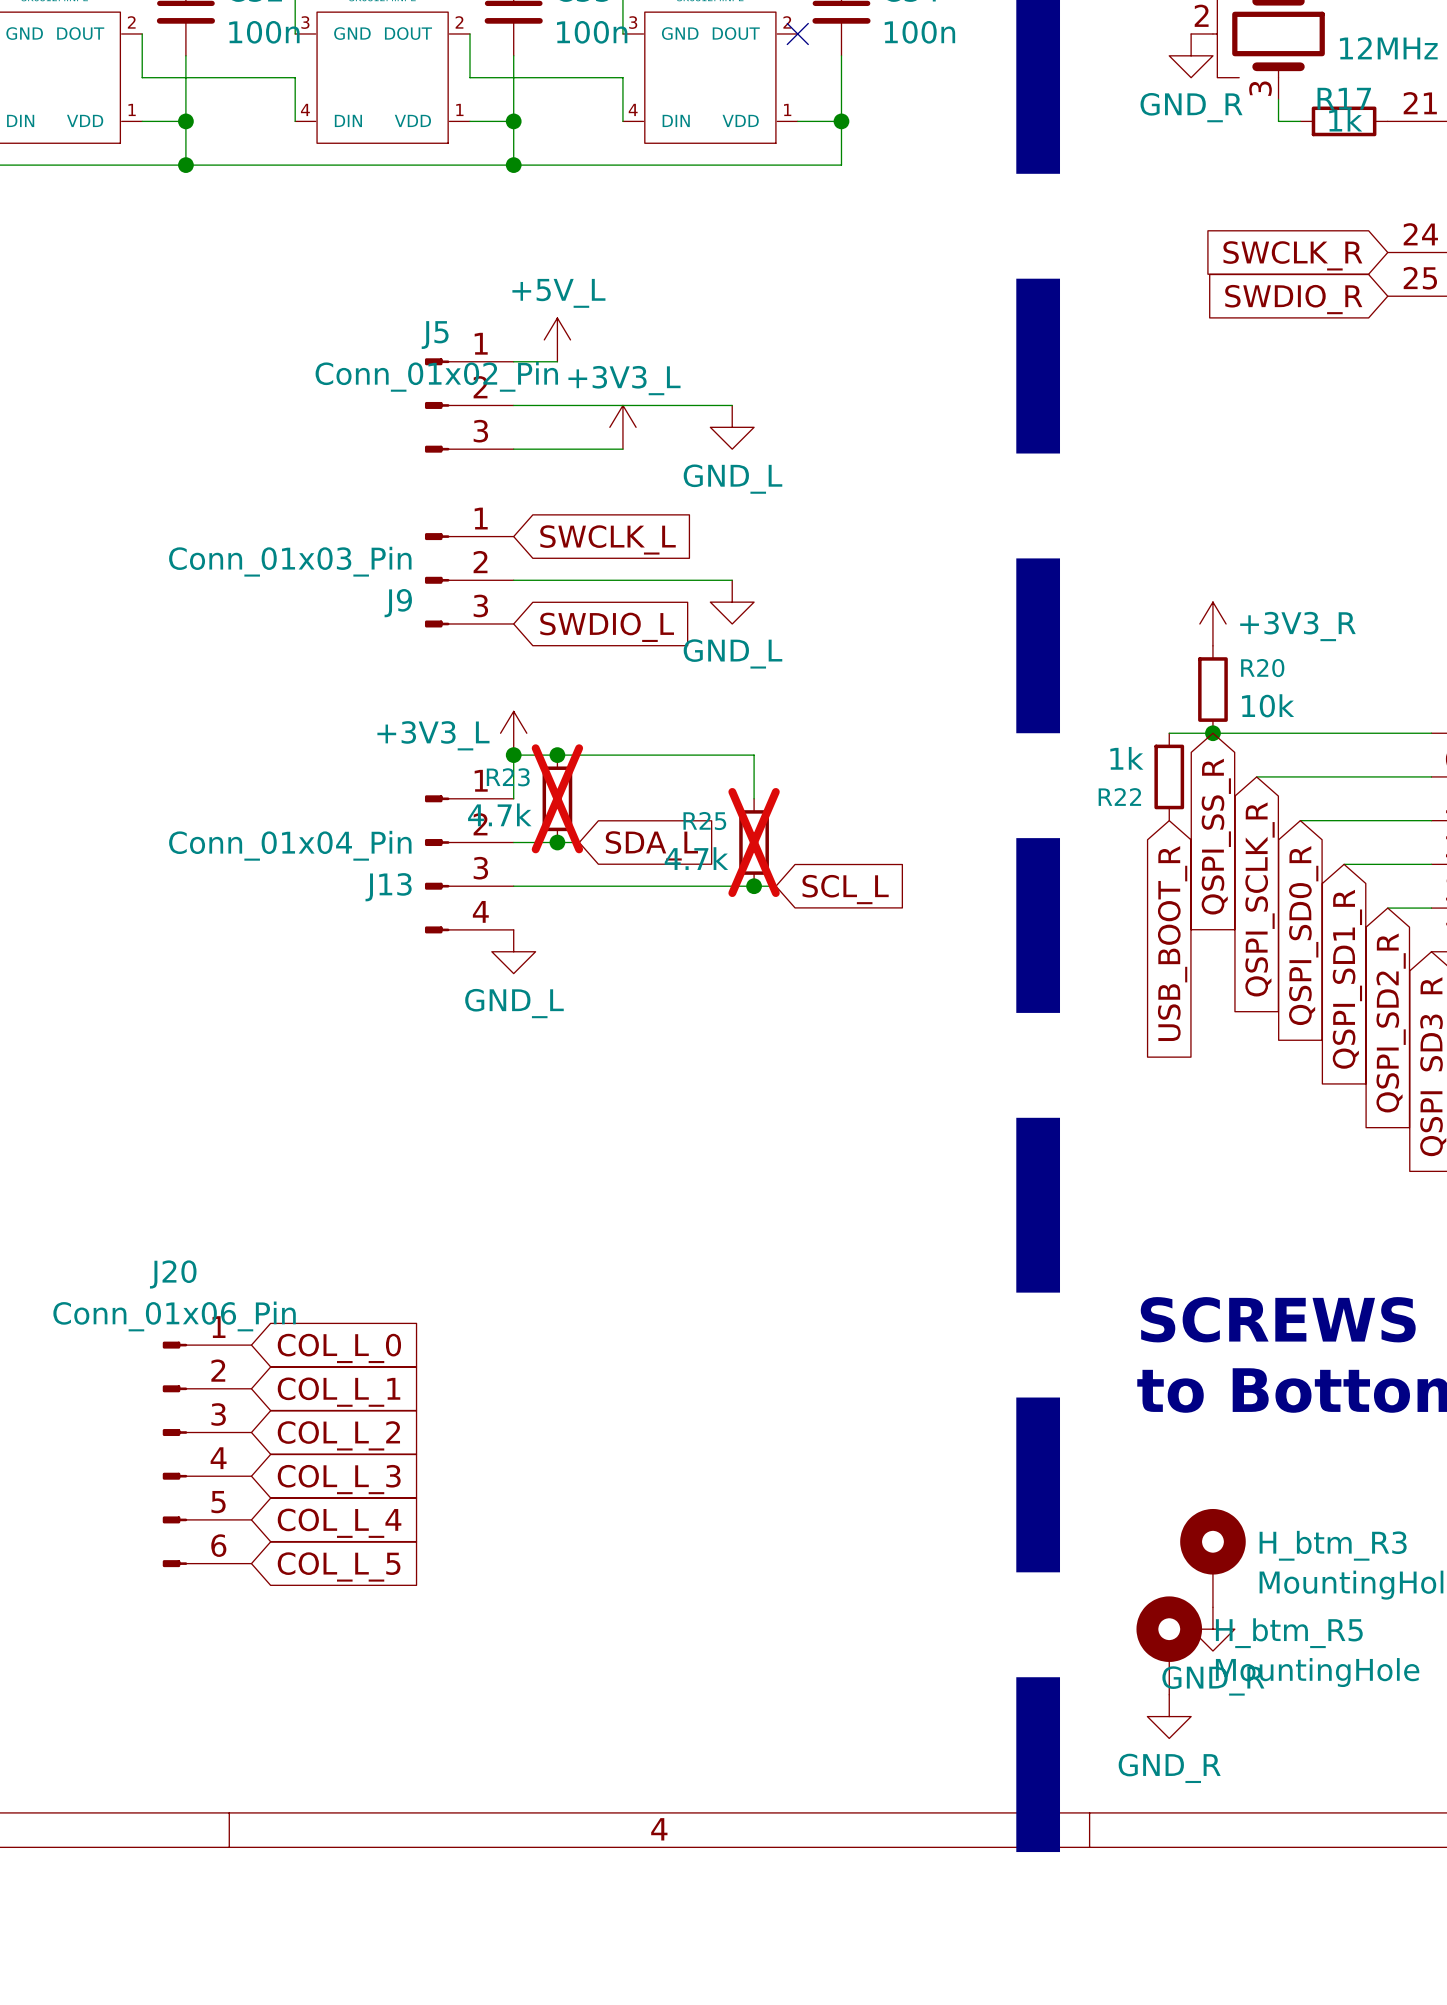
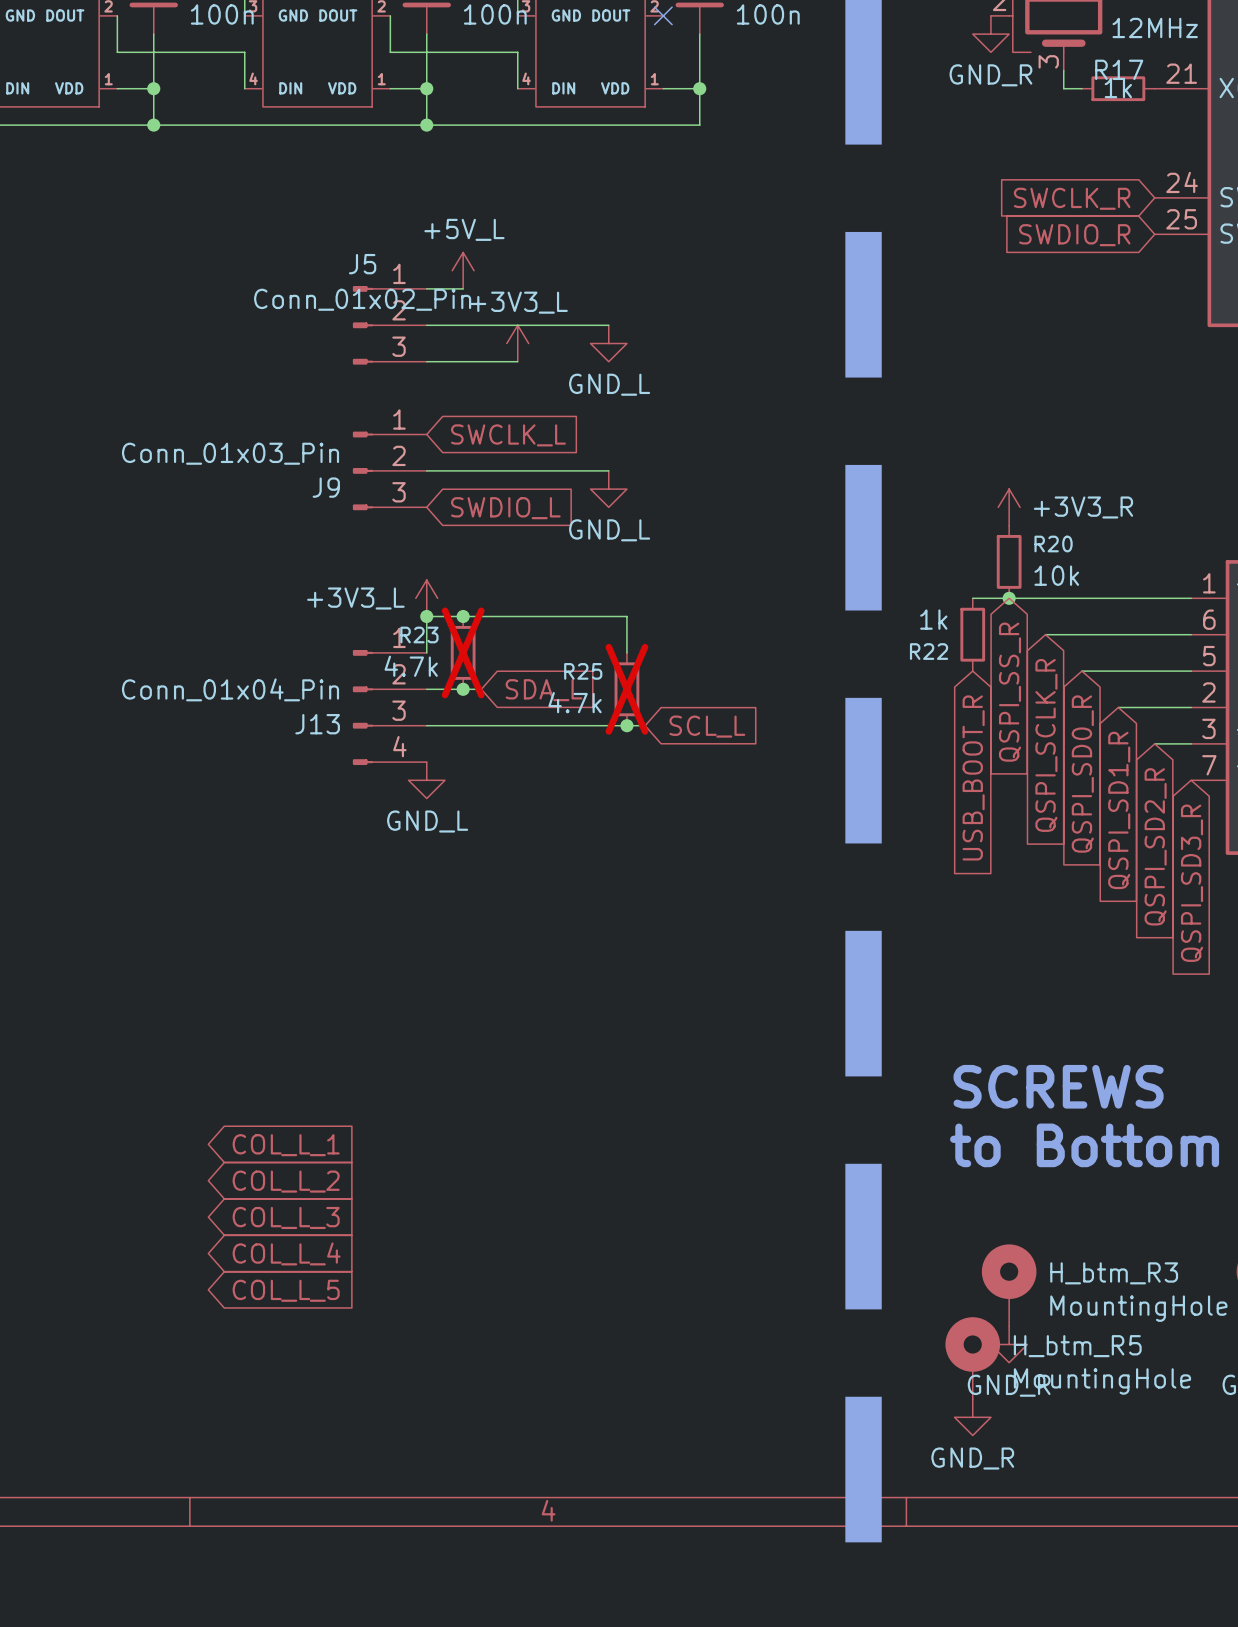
global label: COL_L_0 (339, 1348) -> none
J20: Conn_01x06_Pin (207, 1454) -> none

